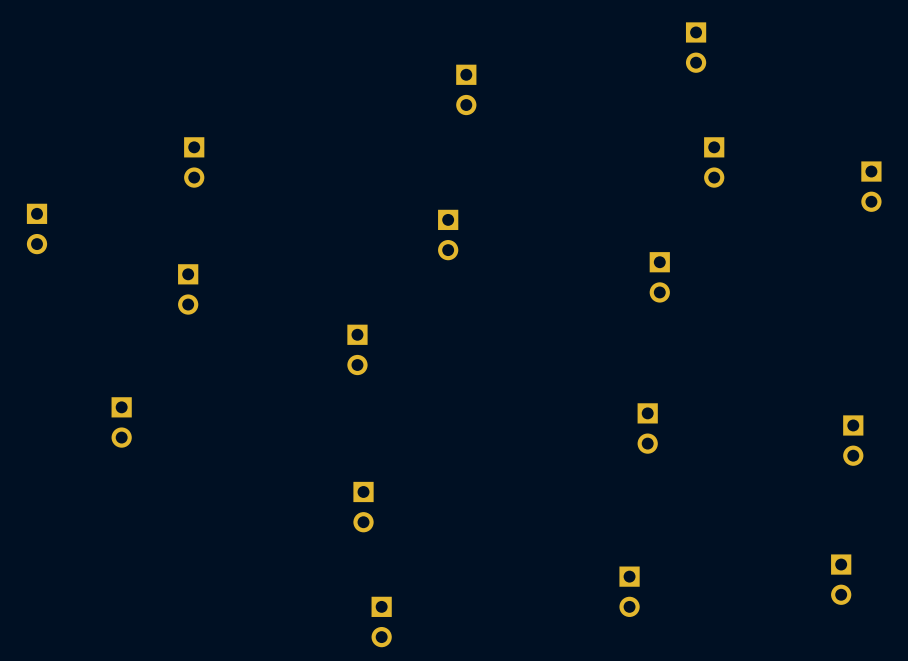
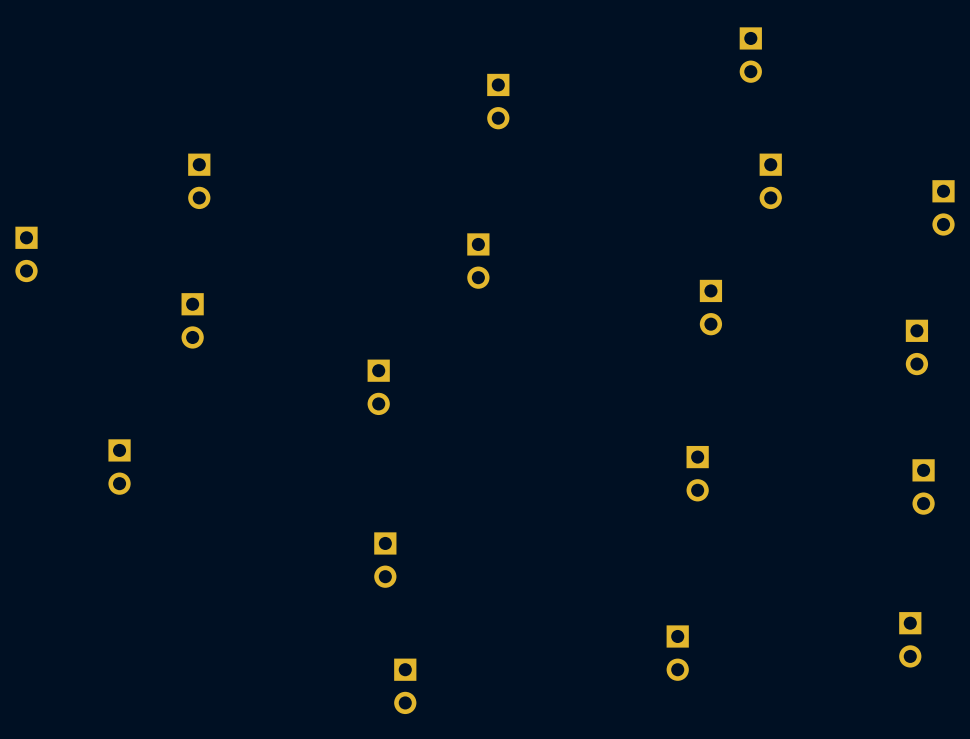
part: none -> (916, 347)

